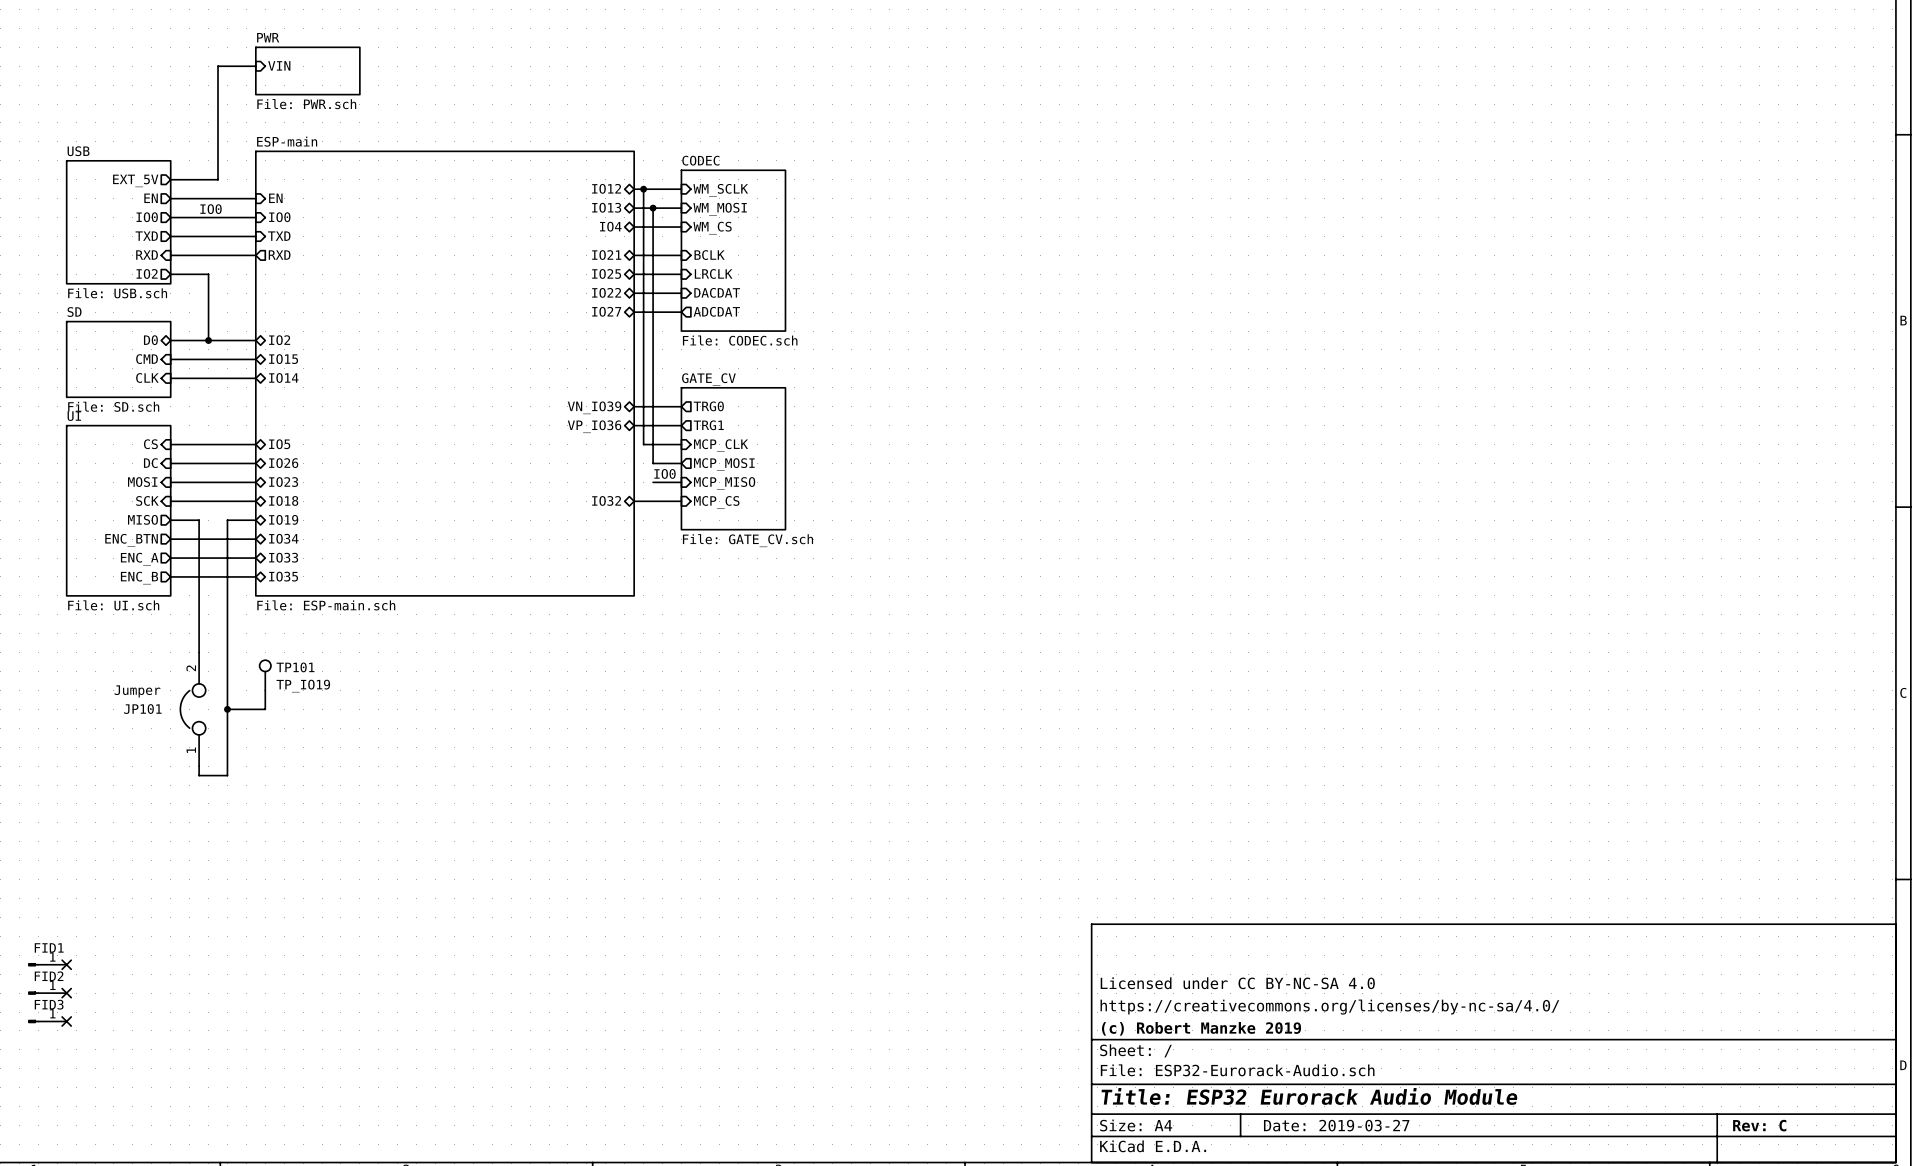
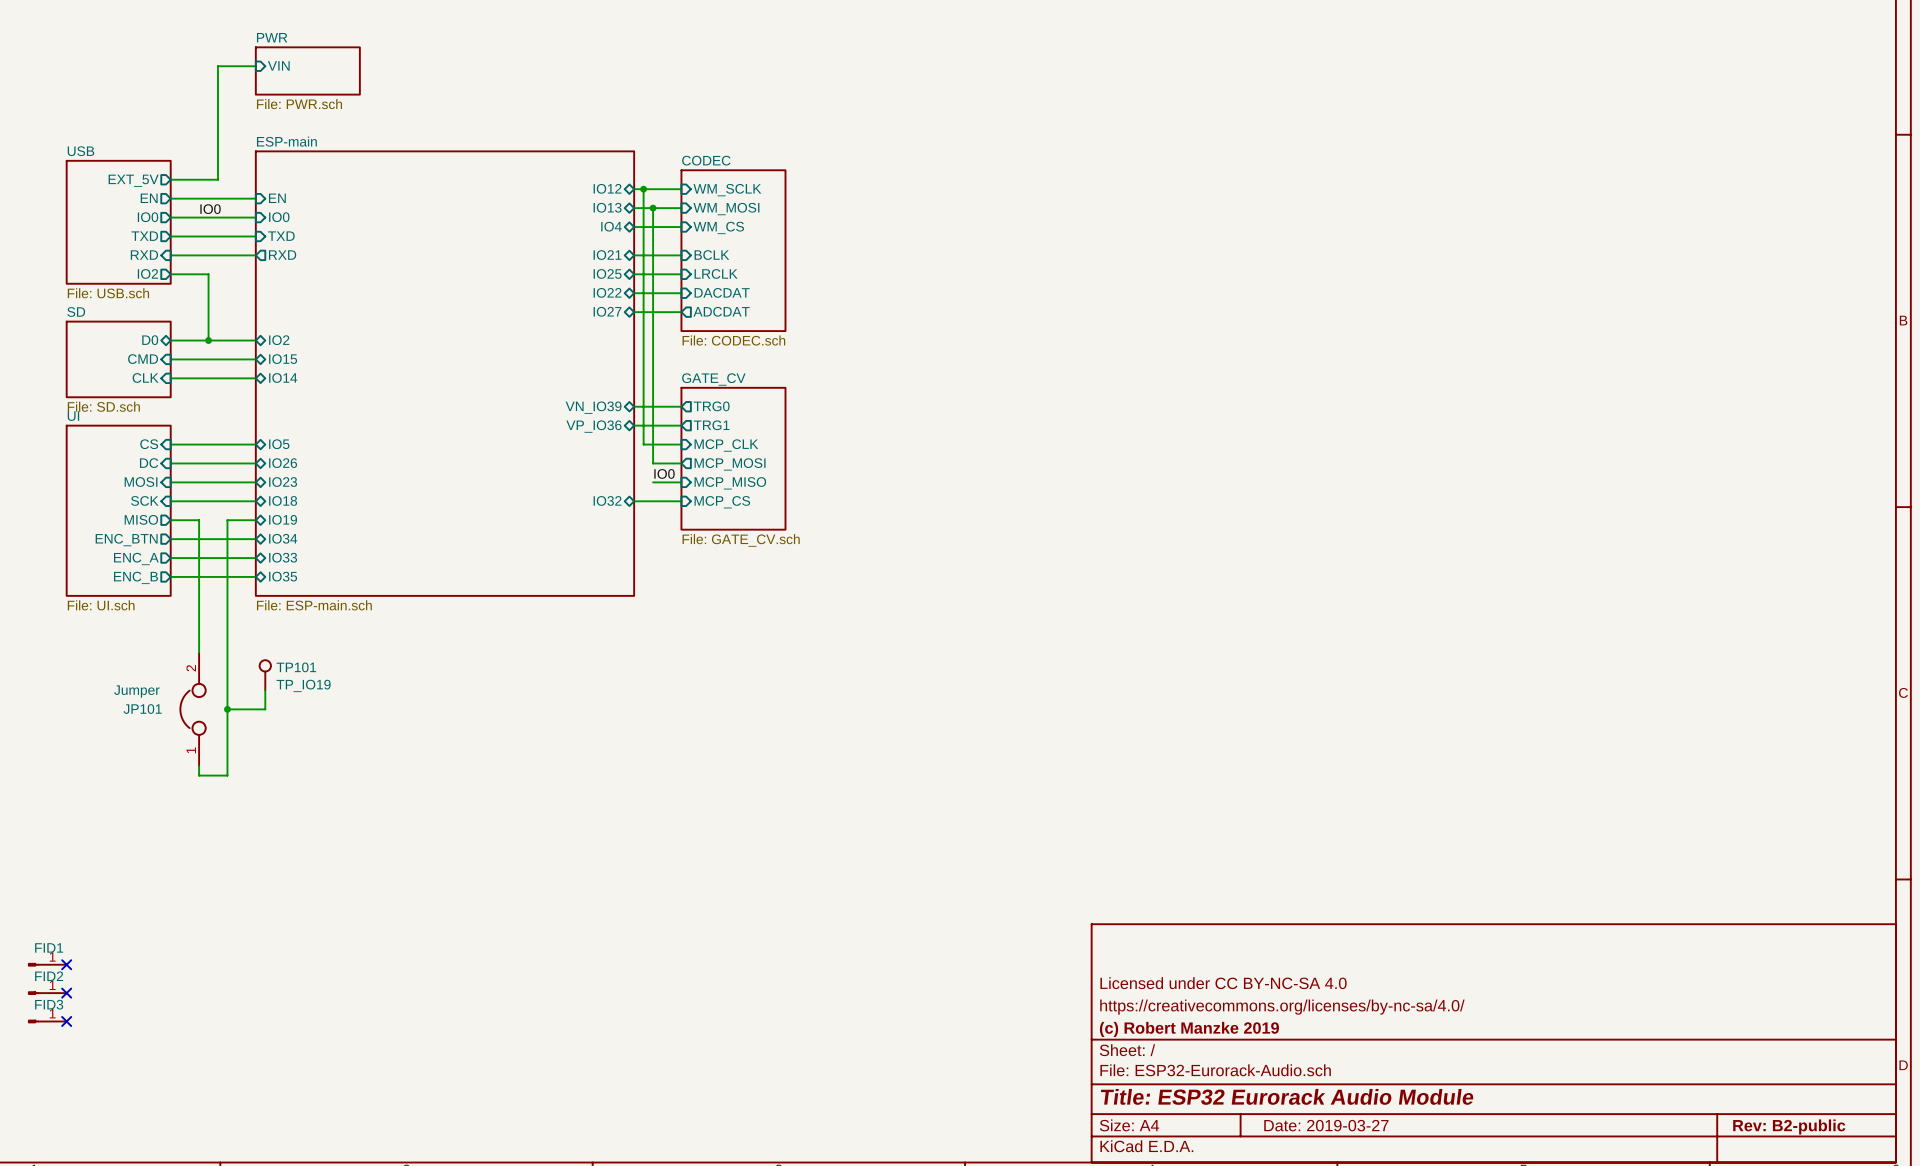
title block: Rev: C (1759, 1125) -> Rev: B2-public (1789, 1126)

